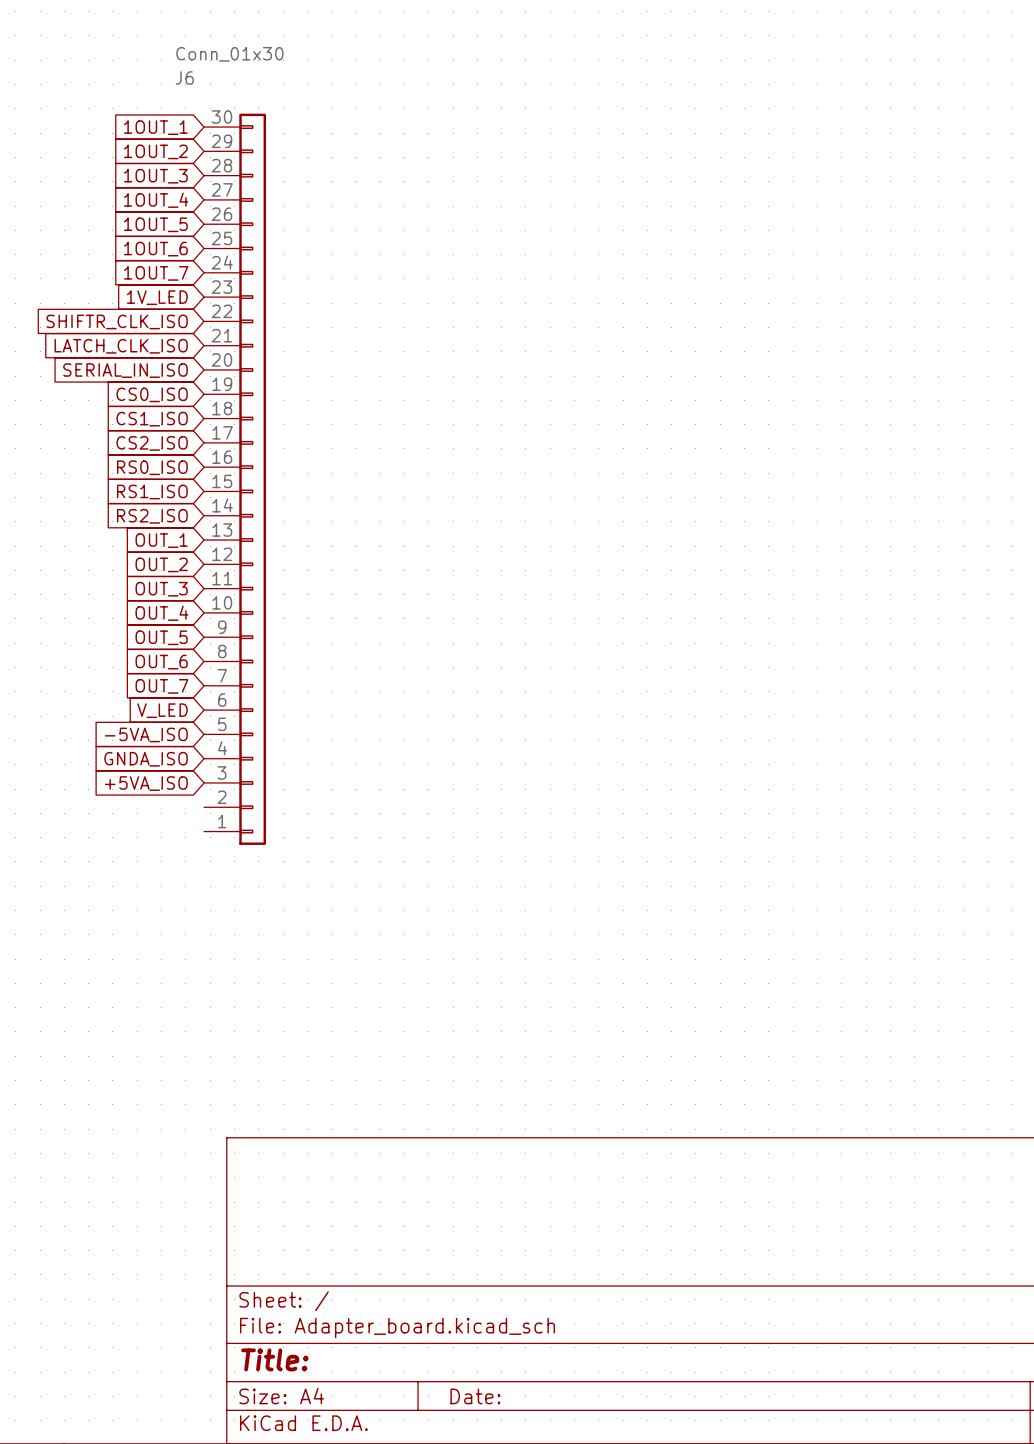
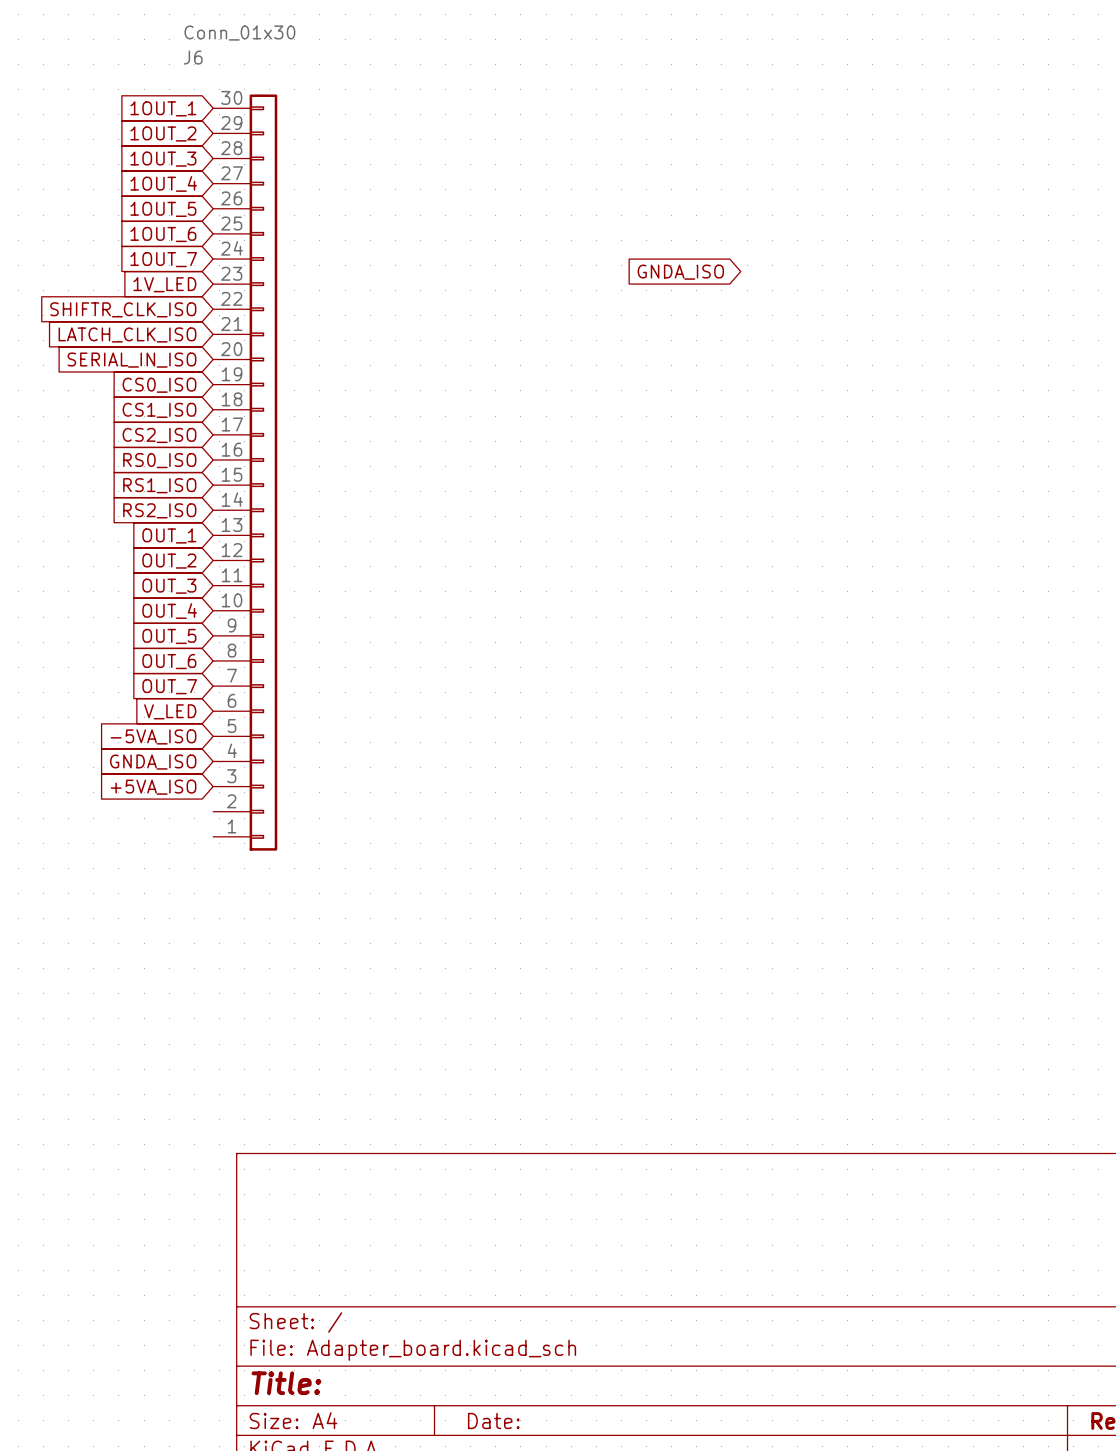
global label: none -> GNDA_ISO (680, 272)

